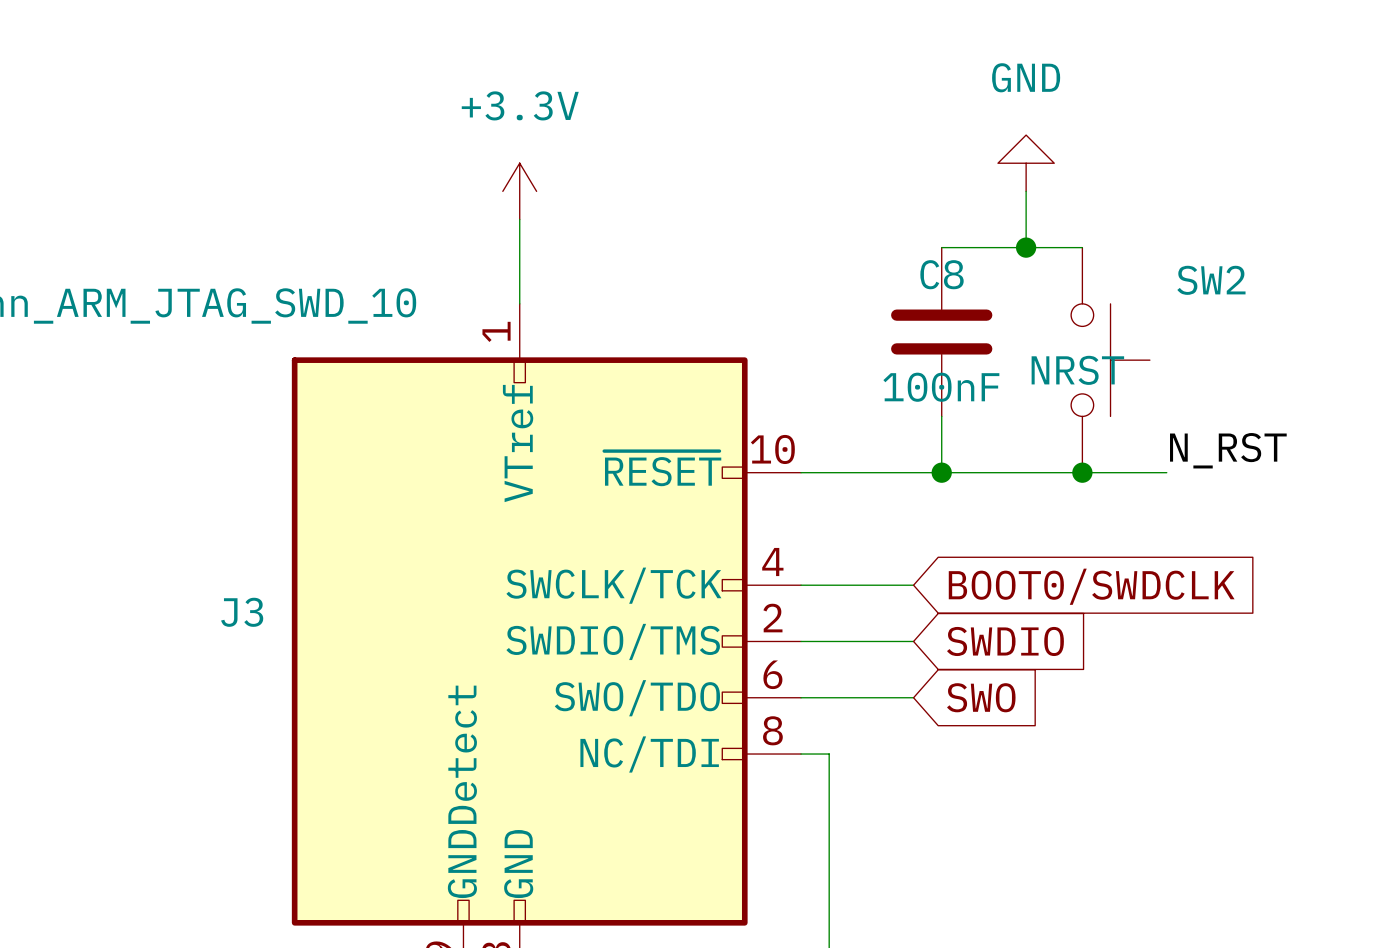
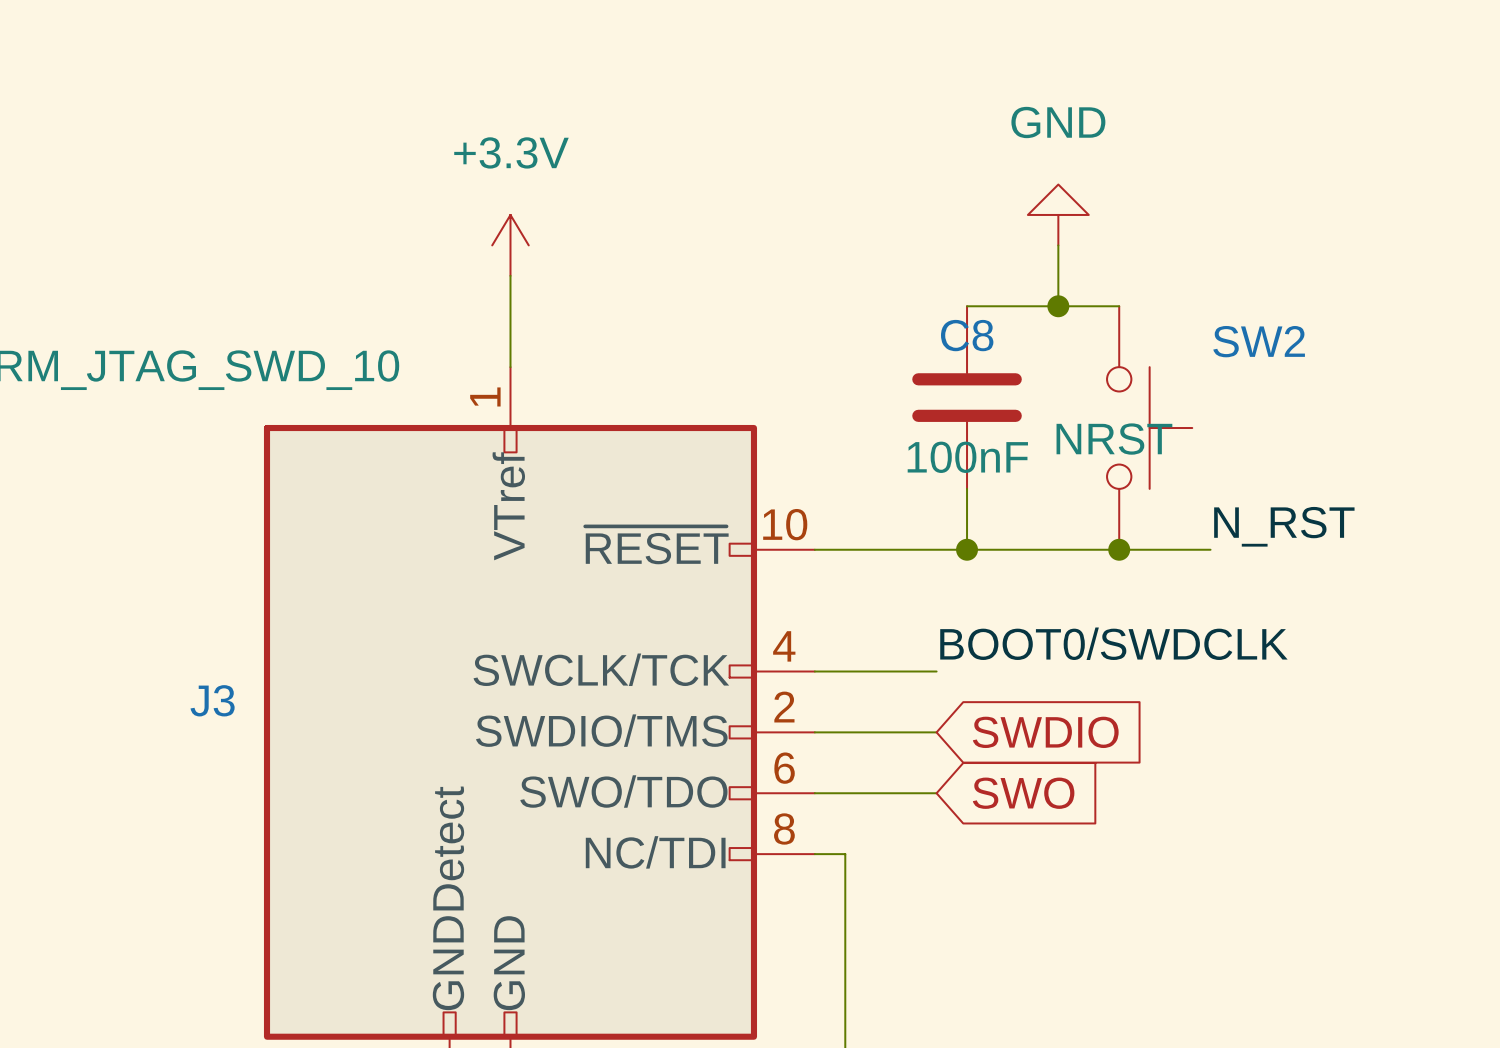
label: none -> BOOT0/SWDCLK (1113, 643)
global label: BOOT0/SWDCLK (1091, 586) -> none

